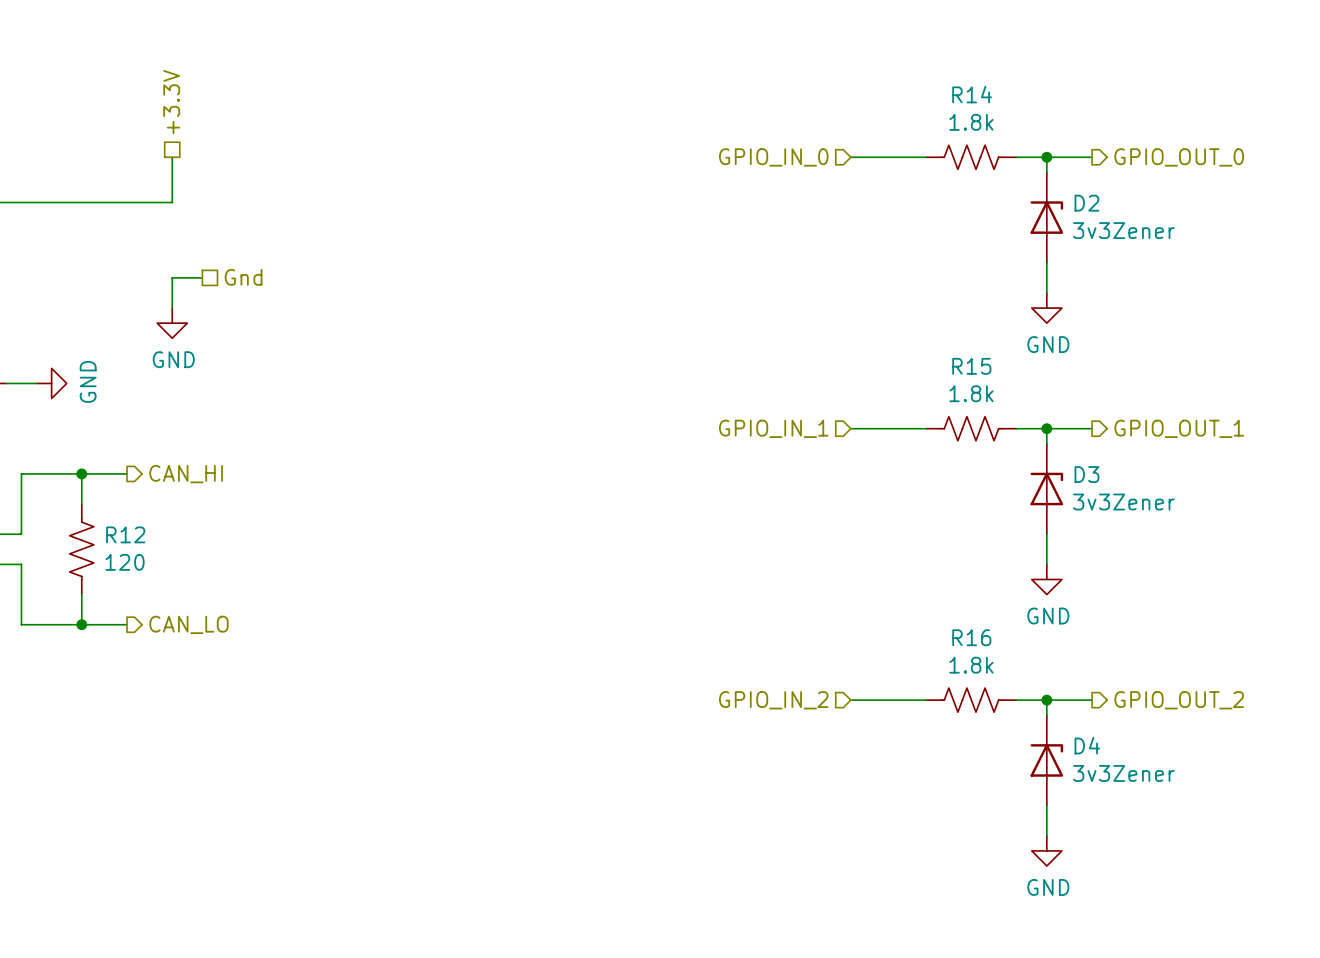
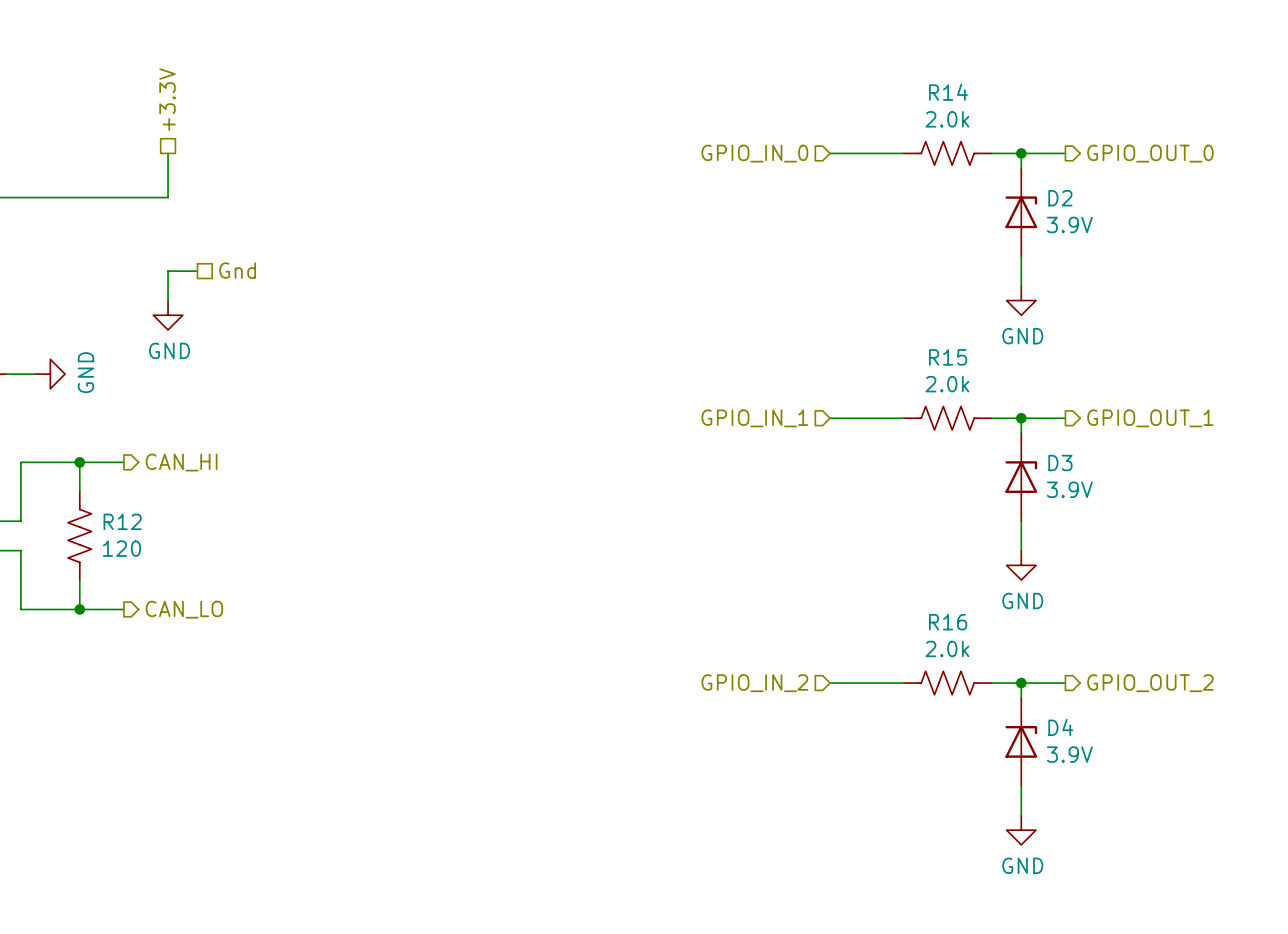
R14 value: 1.8k (971, 122) -> 2.0k (947, 119)
D2 value: 3v3Zener (1123, 230) -> 3.9V (1069, 224)
R15 value: 1.8k (971, 393) -> 2.0k (947, 384)
D3 value: 3v3Zener (1123, 502) -> 3.9V (1069, 489)
R16 value: 1.8k (971, 665) -> 2.0k (947, 648)
D4 value: 3v3Zener (1123, 773) -> 3.9V (1069, 754)

